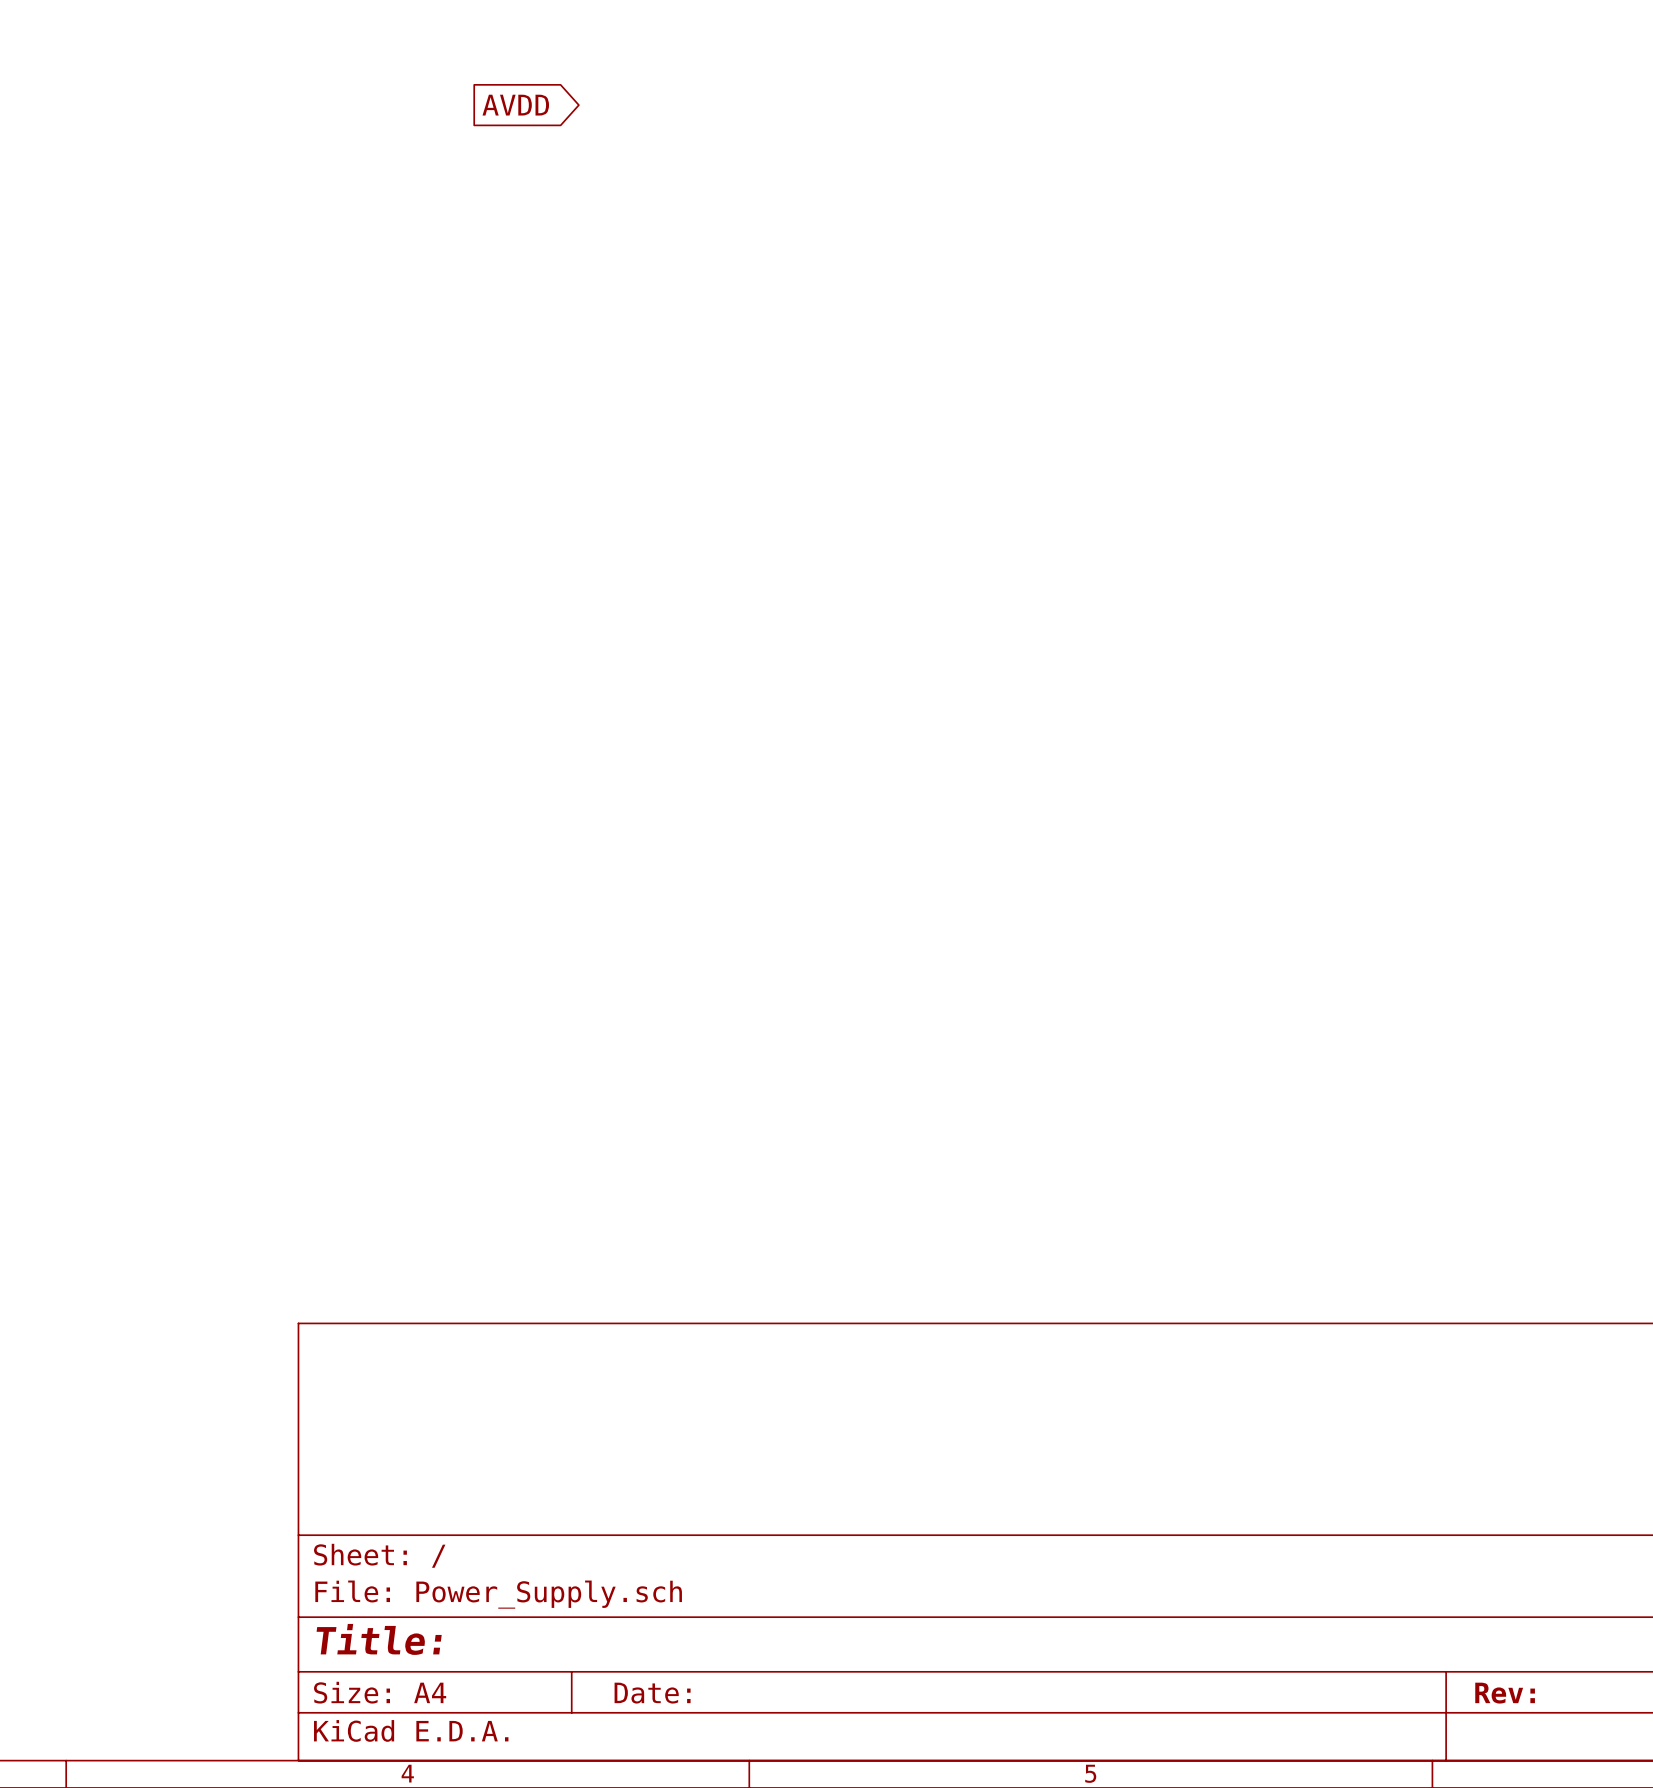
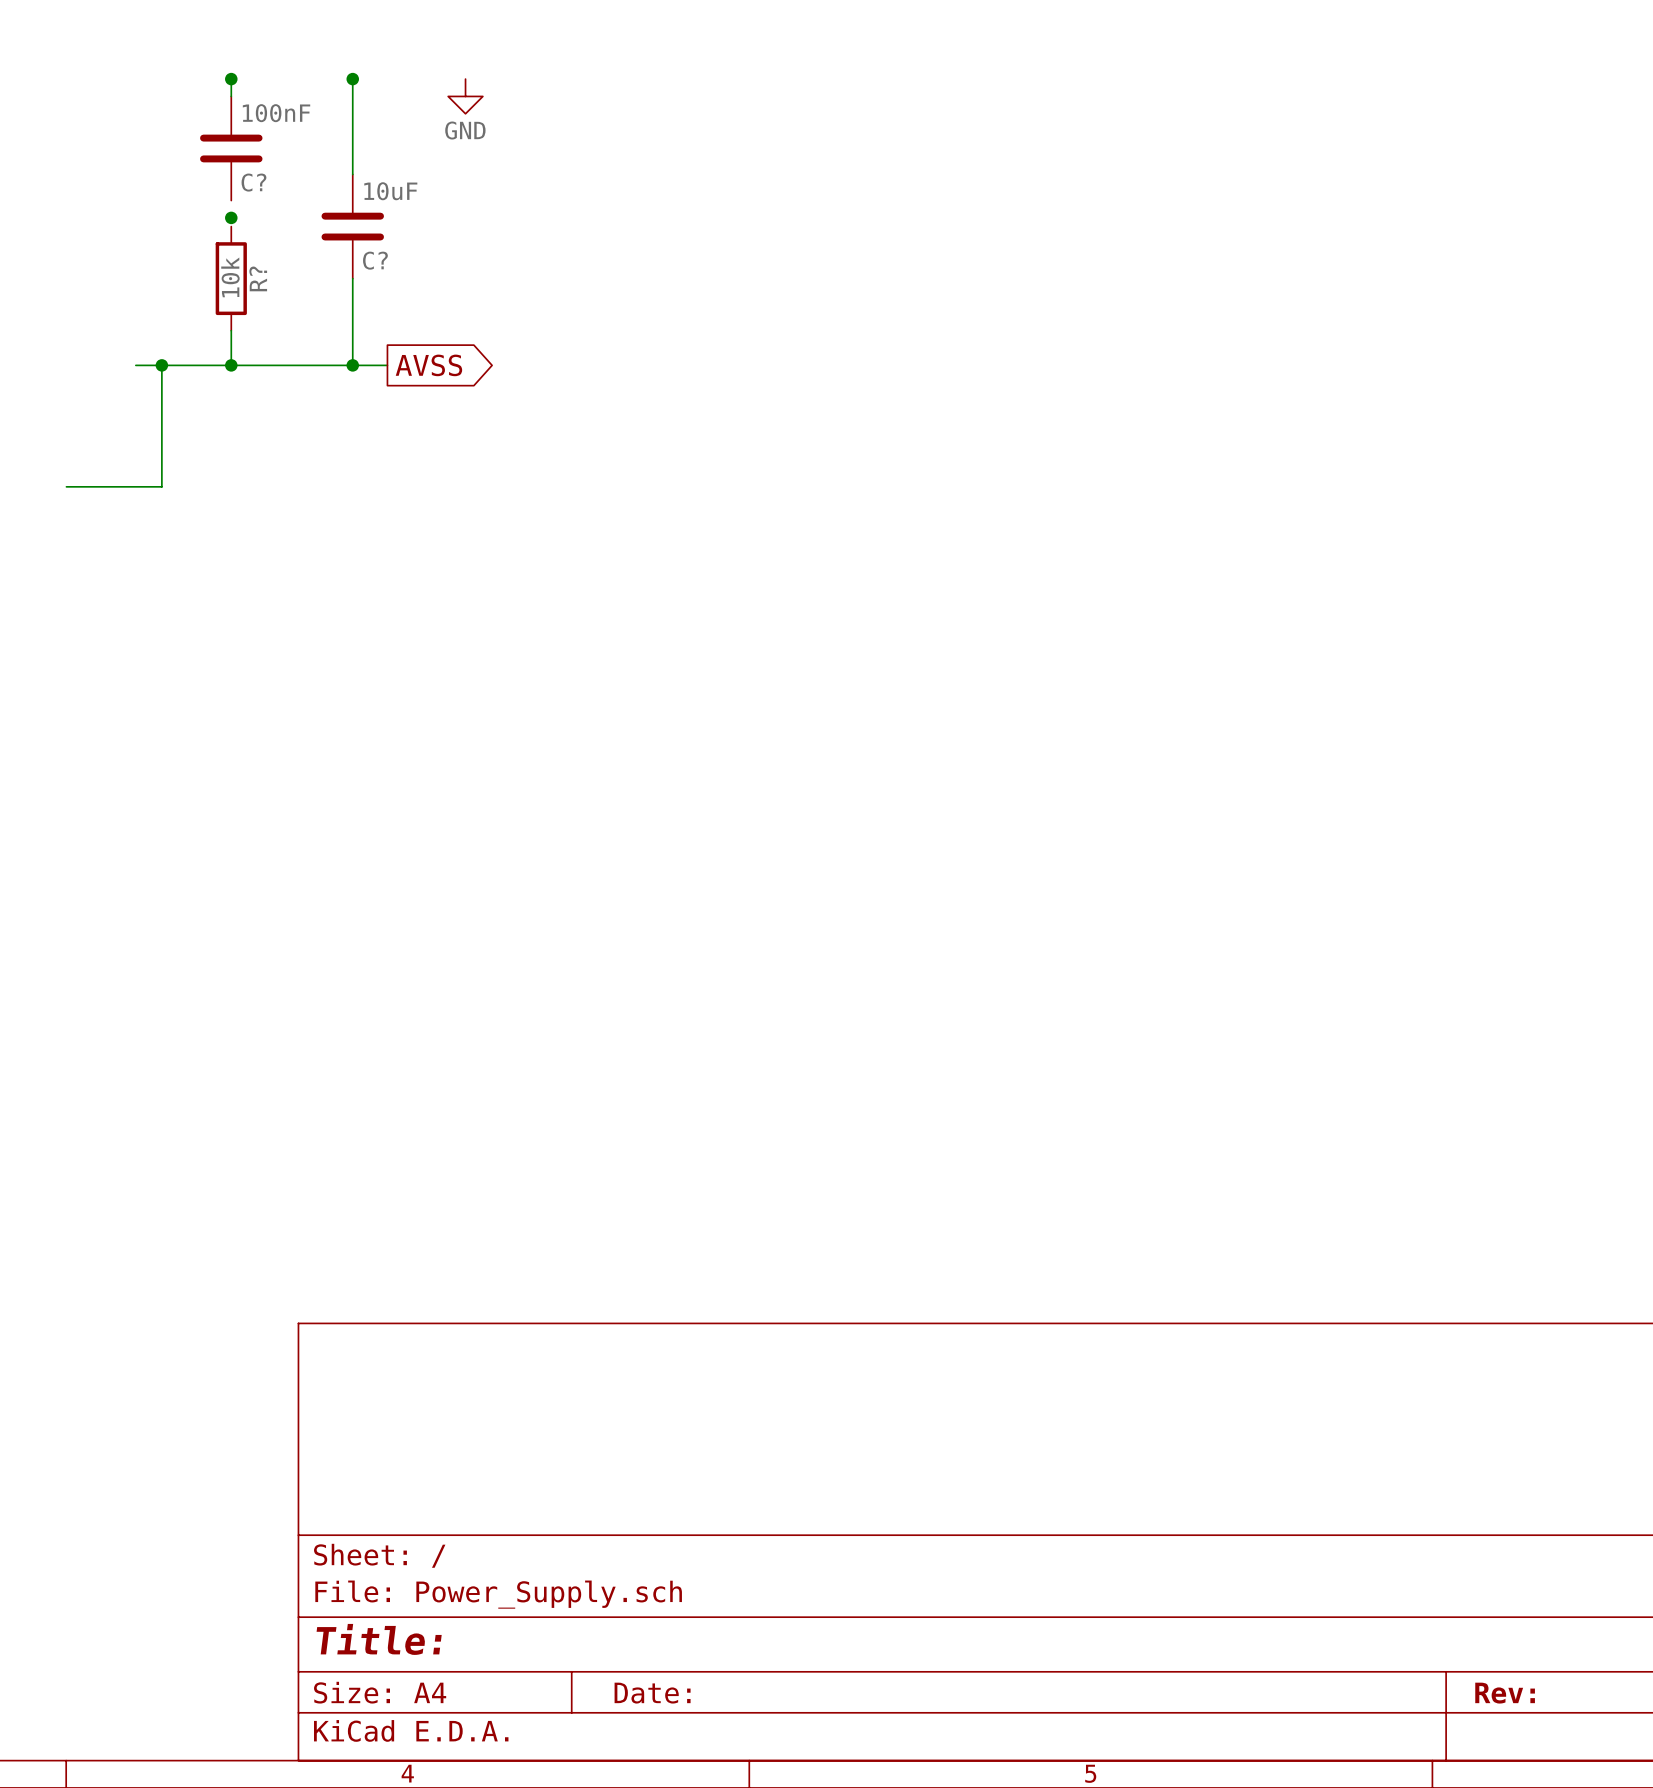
wire: none -> (231, 79) (231, 96)
junction: none -> (231, 79)
wire: none -> (352, 79) (352, 174)
junction: none -> (352, 79)
power symbol: none -> GND (465, 96)
global label: AVDD (515, 105) -> none
C?: none -> 100nF (231, 148)
junction: none -> (231, 217)
C?: none -> 10uF (352, 226)
R?: none -> 10k (231, 278)
wire: none -> (352, 278) (352, 365)
wire: none -> (231, 330) (231, 365)
wire: none -> (135, 365) (387, 365)
wire: none -> (161, 365) (161, 486) (66, 486)
junction: none -> (161, 365)
junction: none -> (231, 365)
junction: none -> (352, 365)
global label: none -> AVSS (428, 365)

